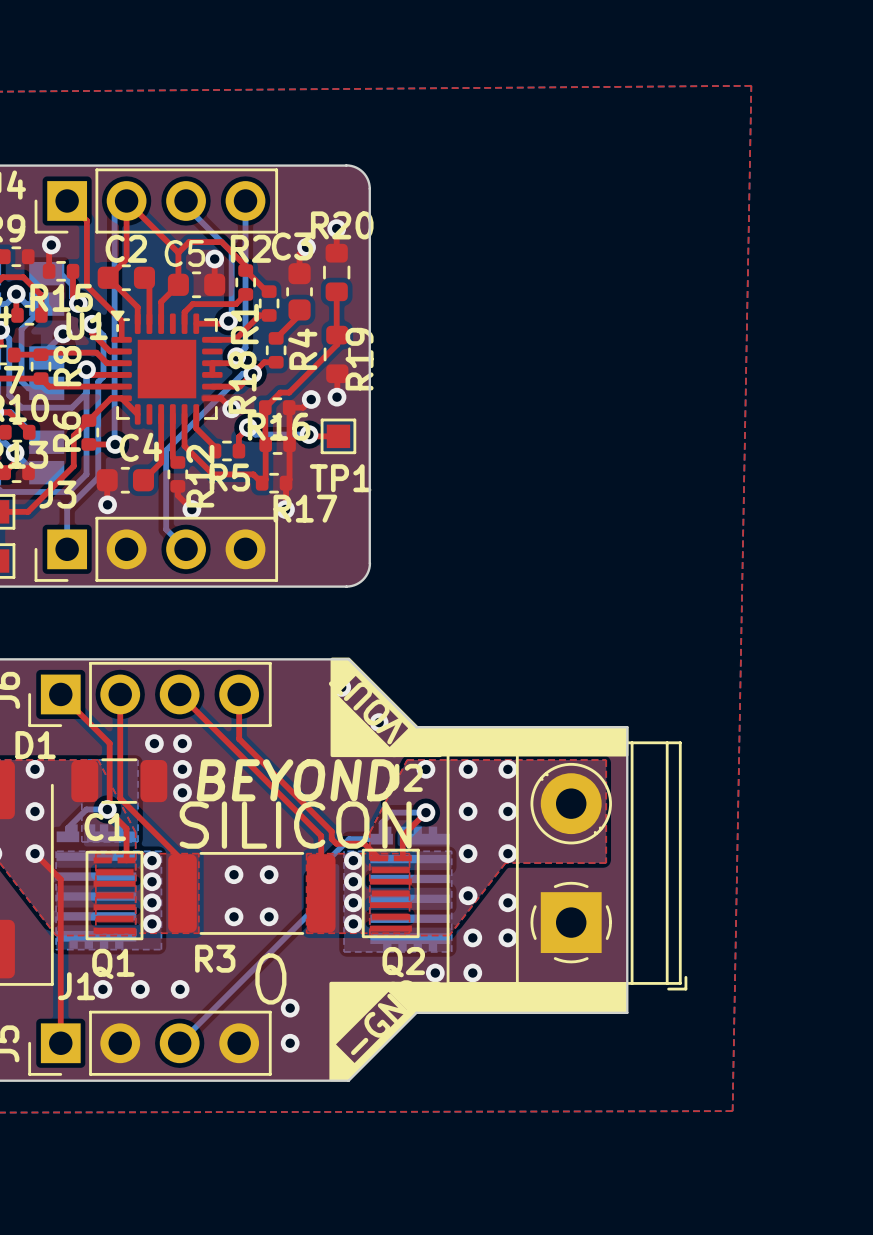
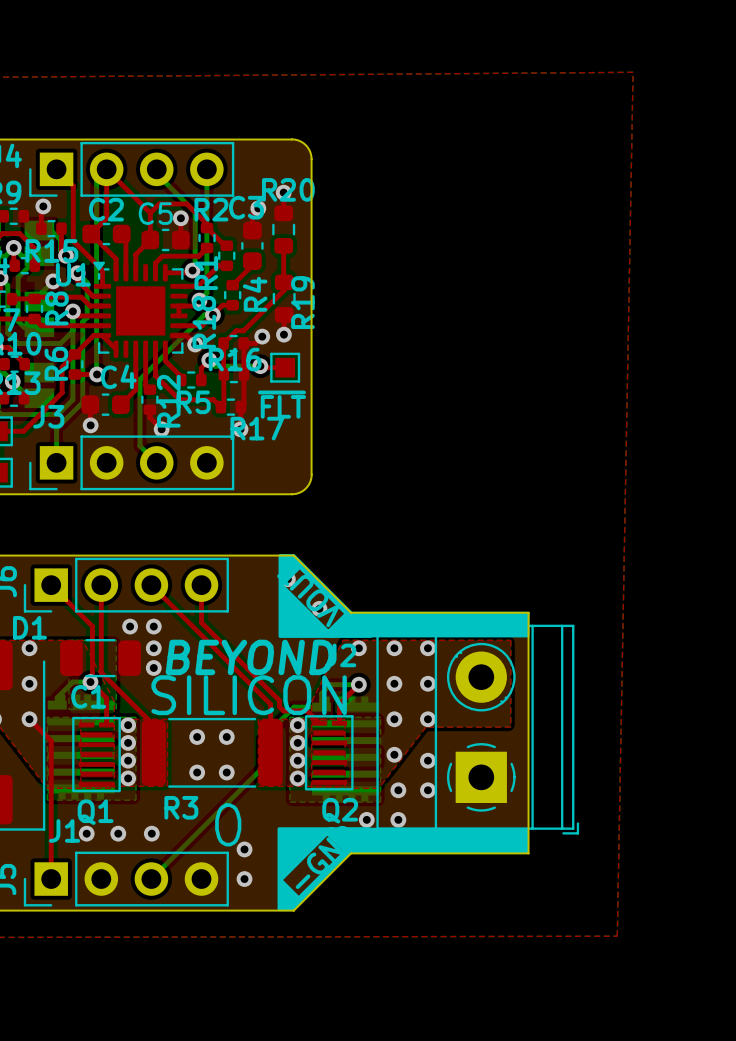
TP1 name: TP1 (340, 478) -> none
TP1 value: none -> ~{FLT} (282, 404)

